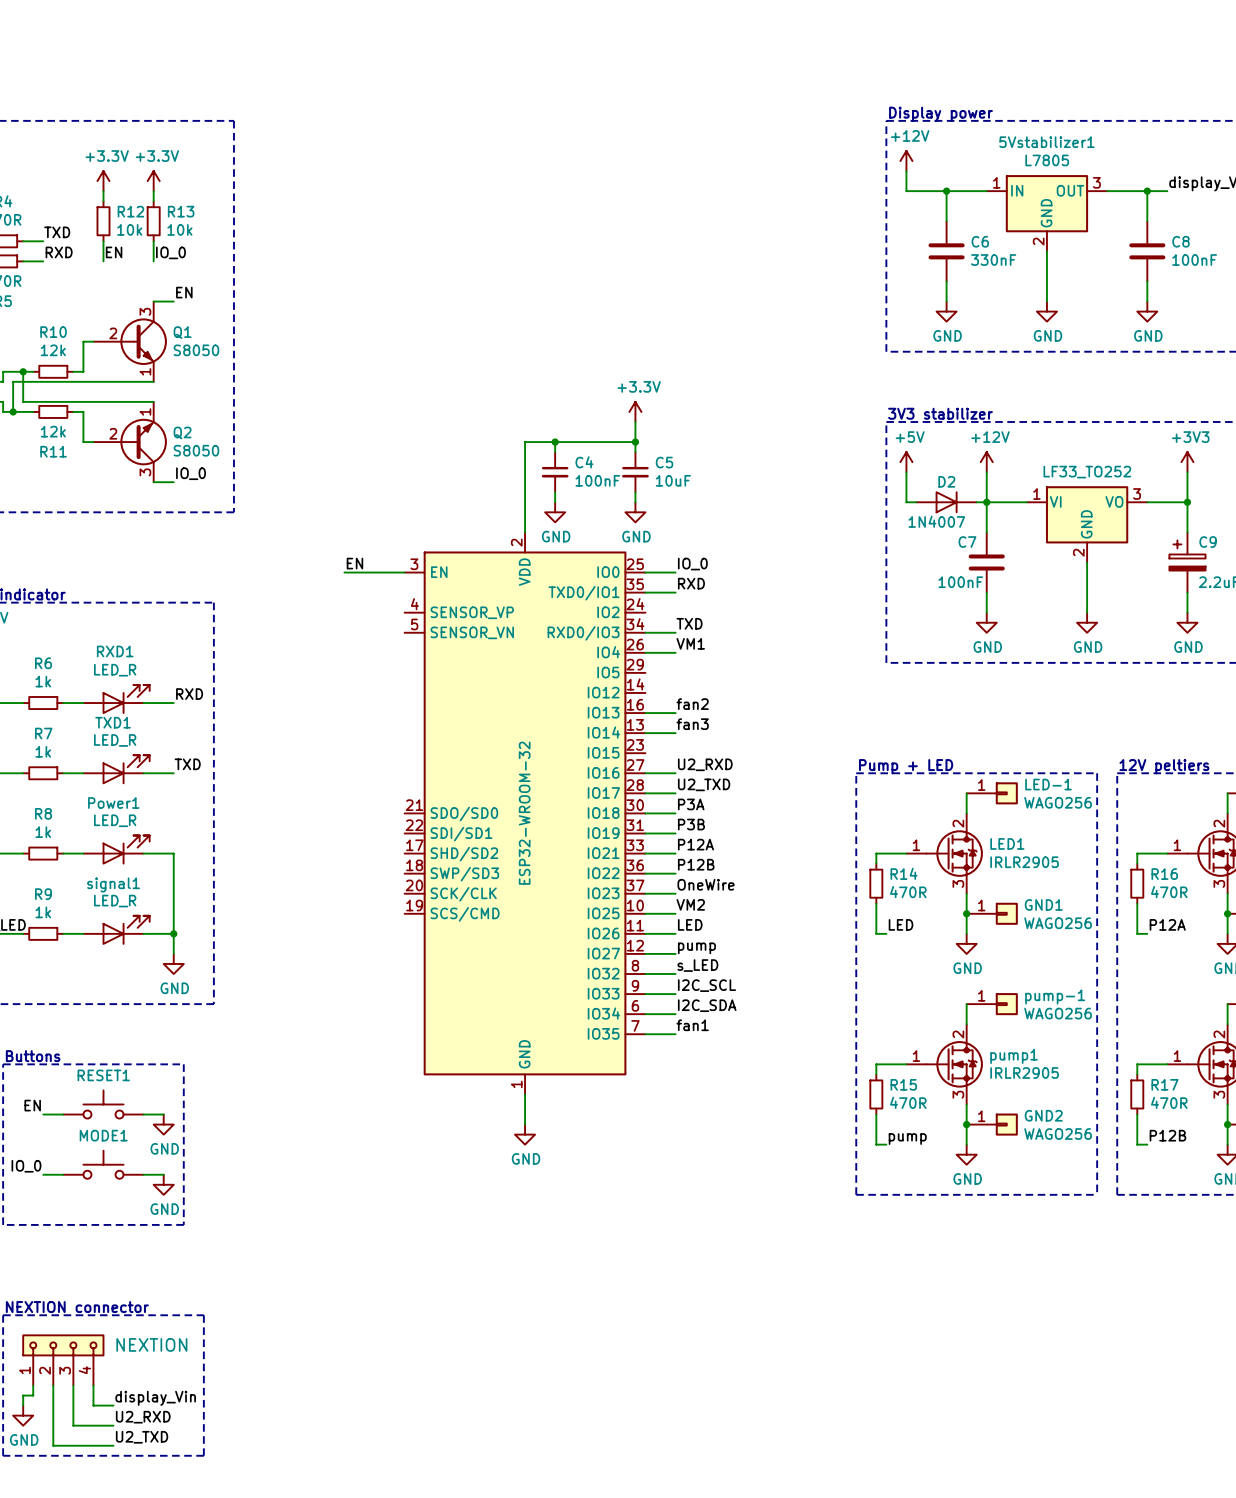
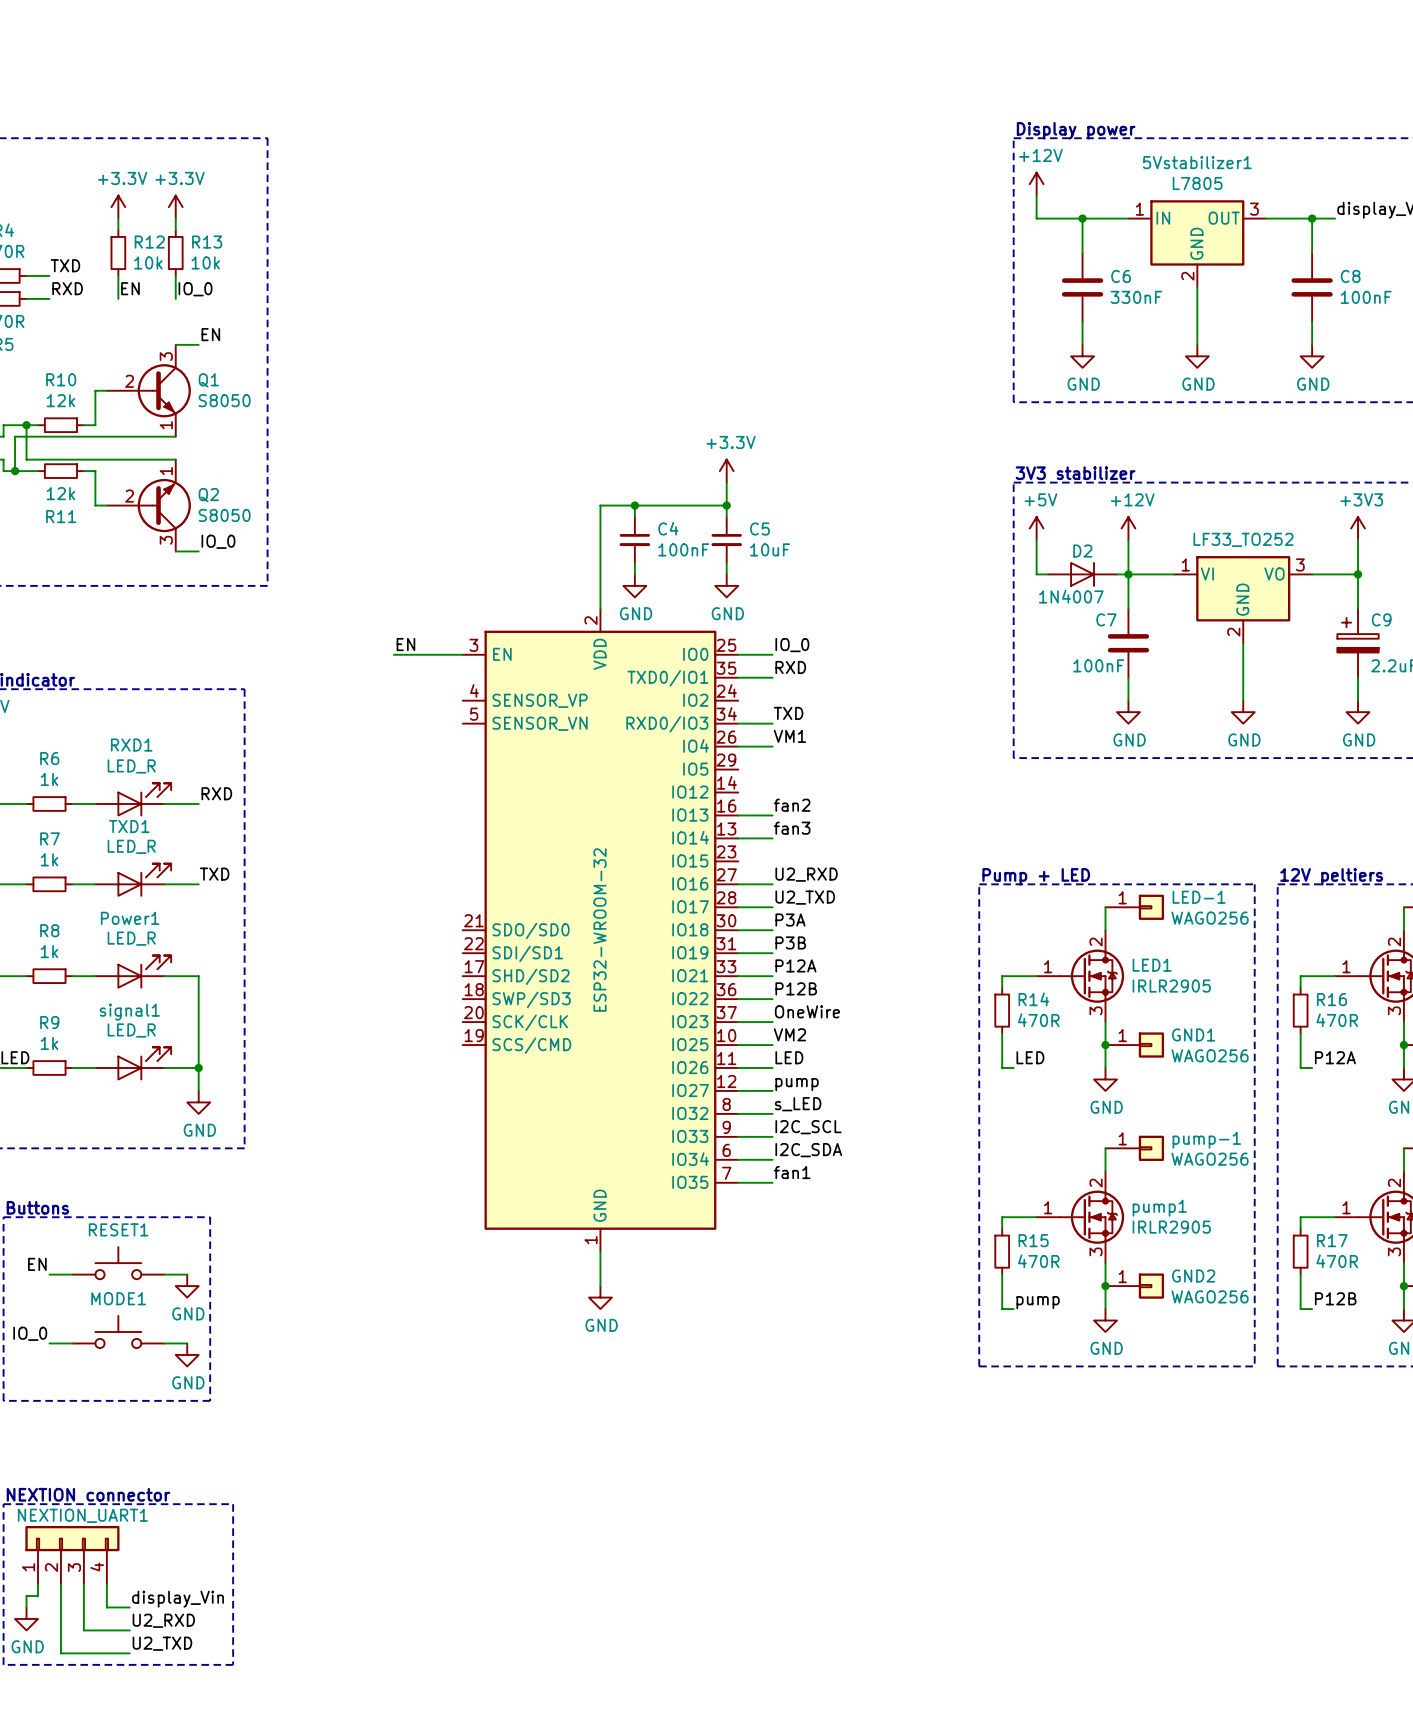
NEXTION_UART1: none -> (72, 1555)
part: NEXTION (63, 1360) -> none

